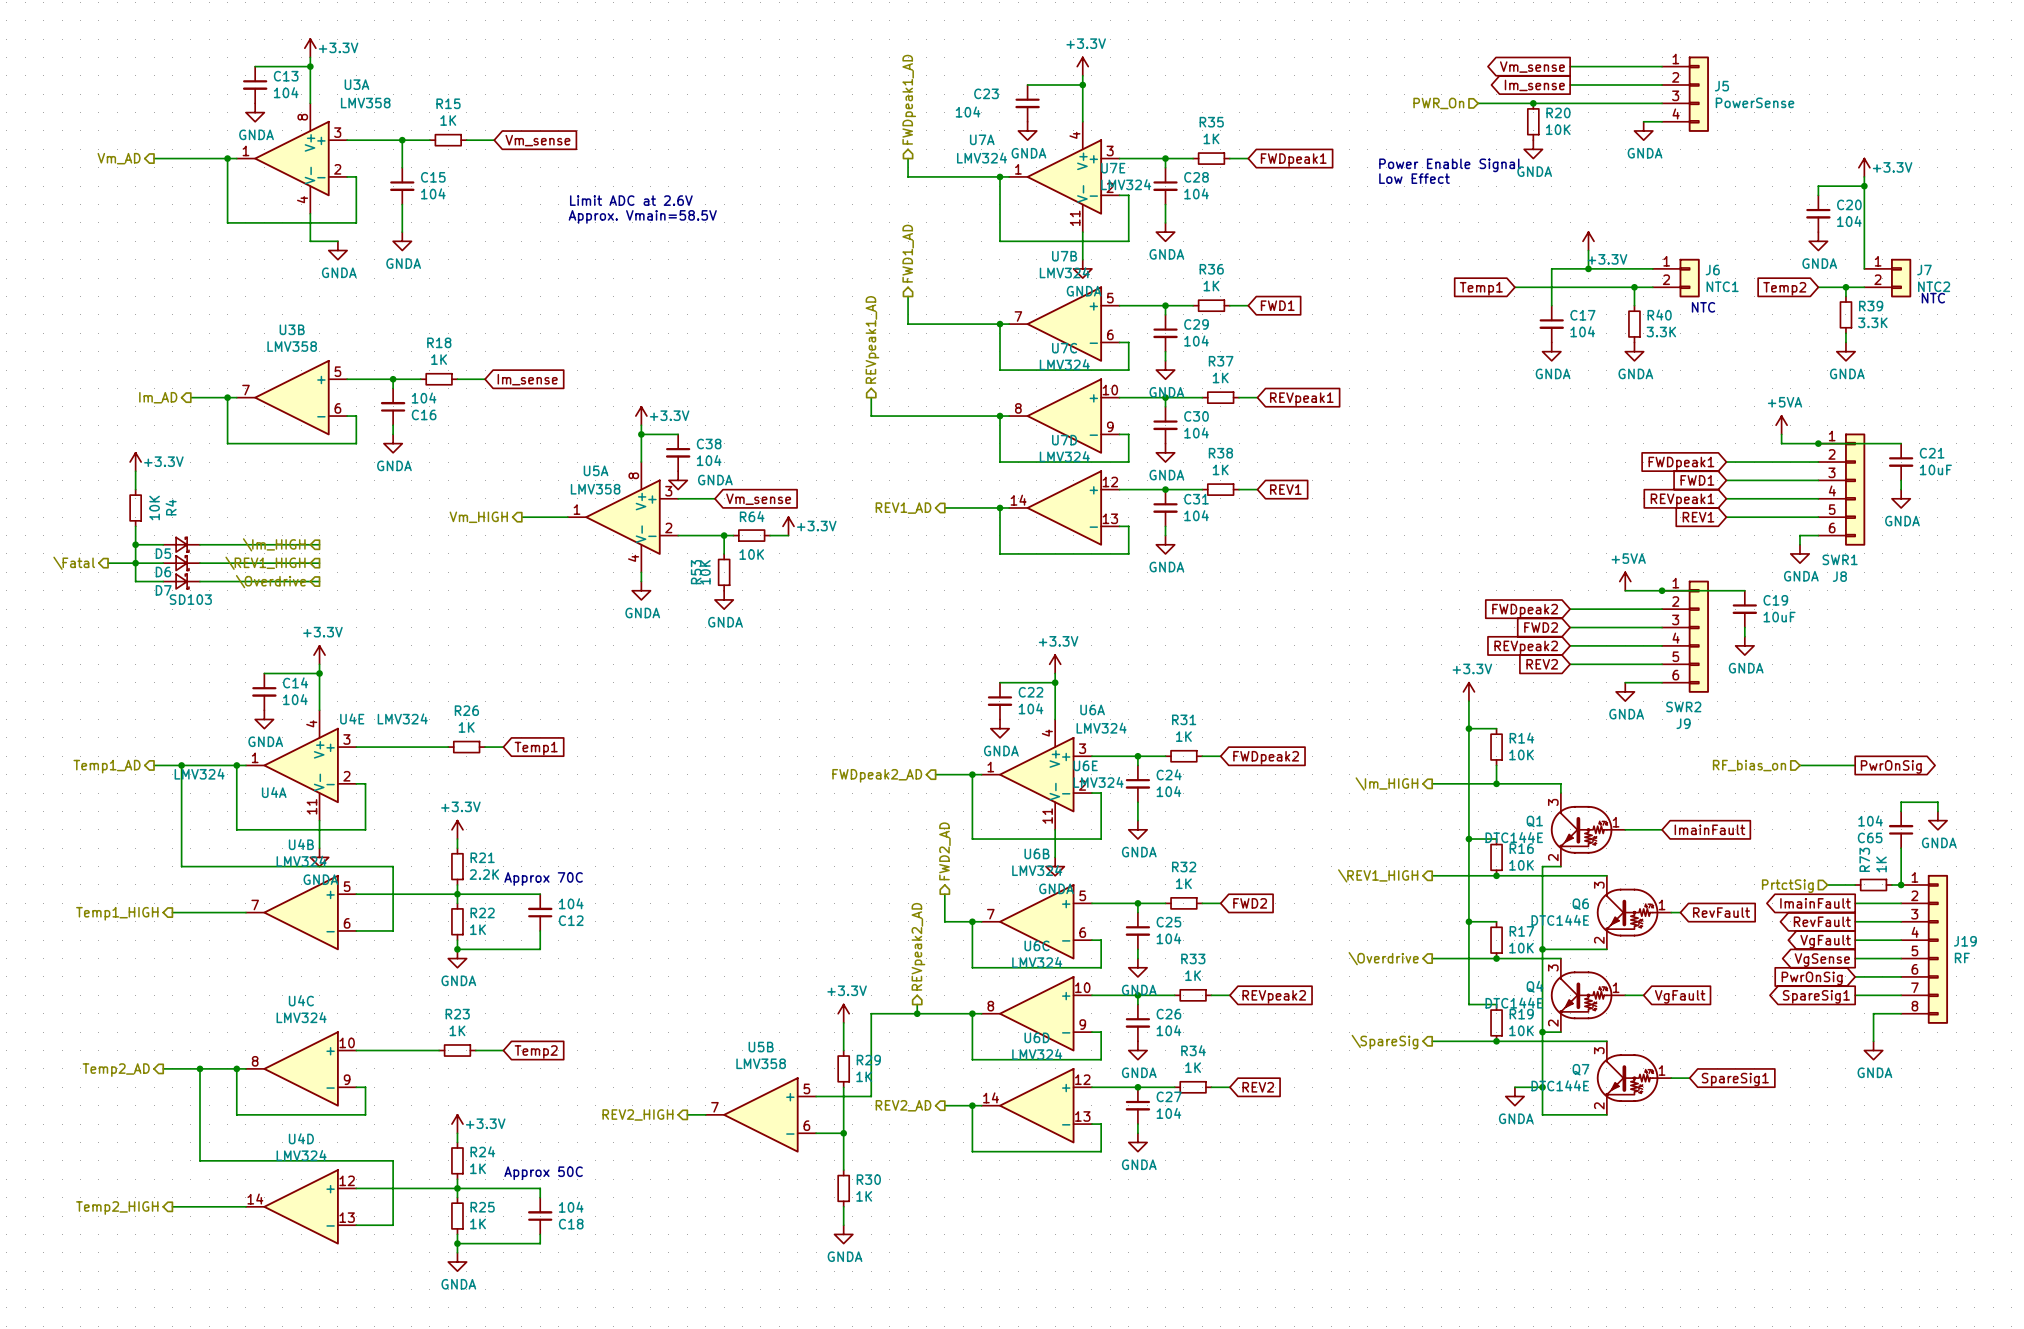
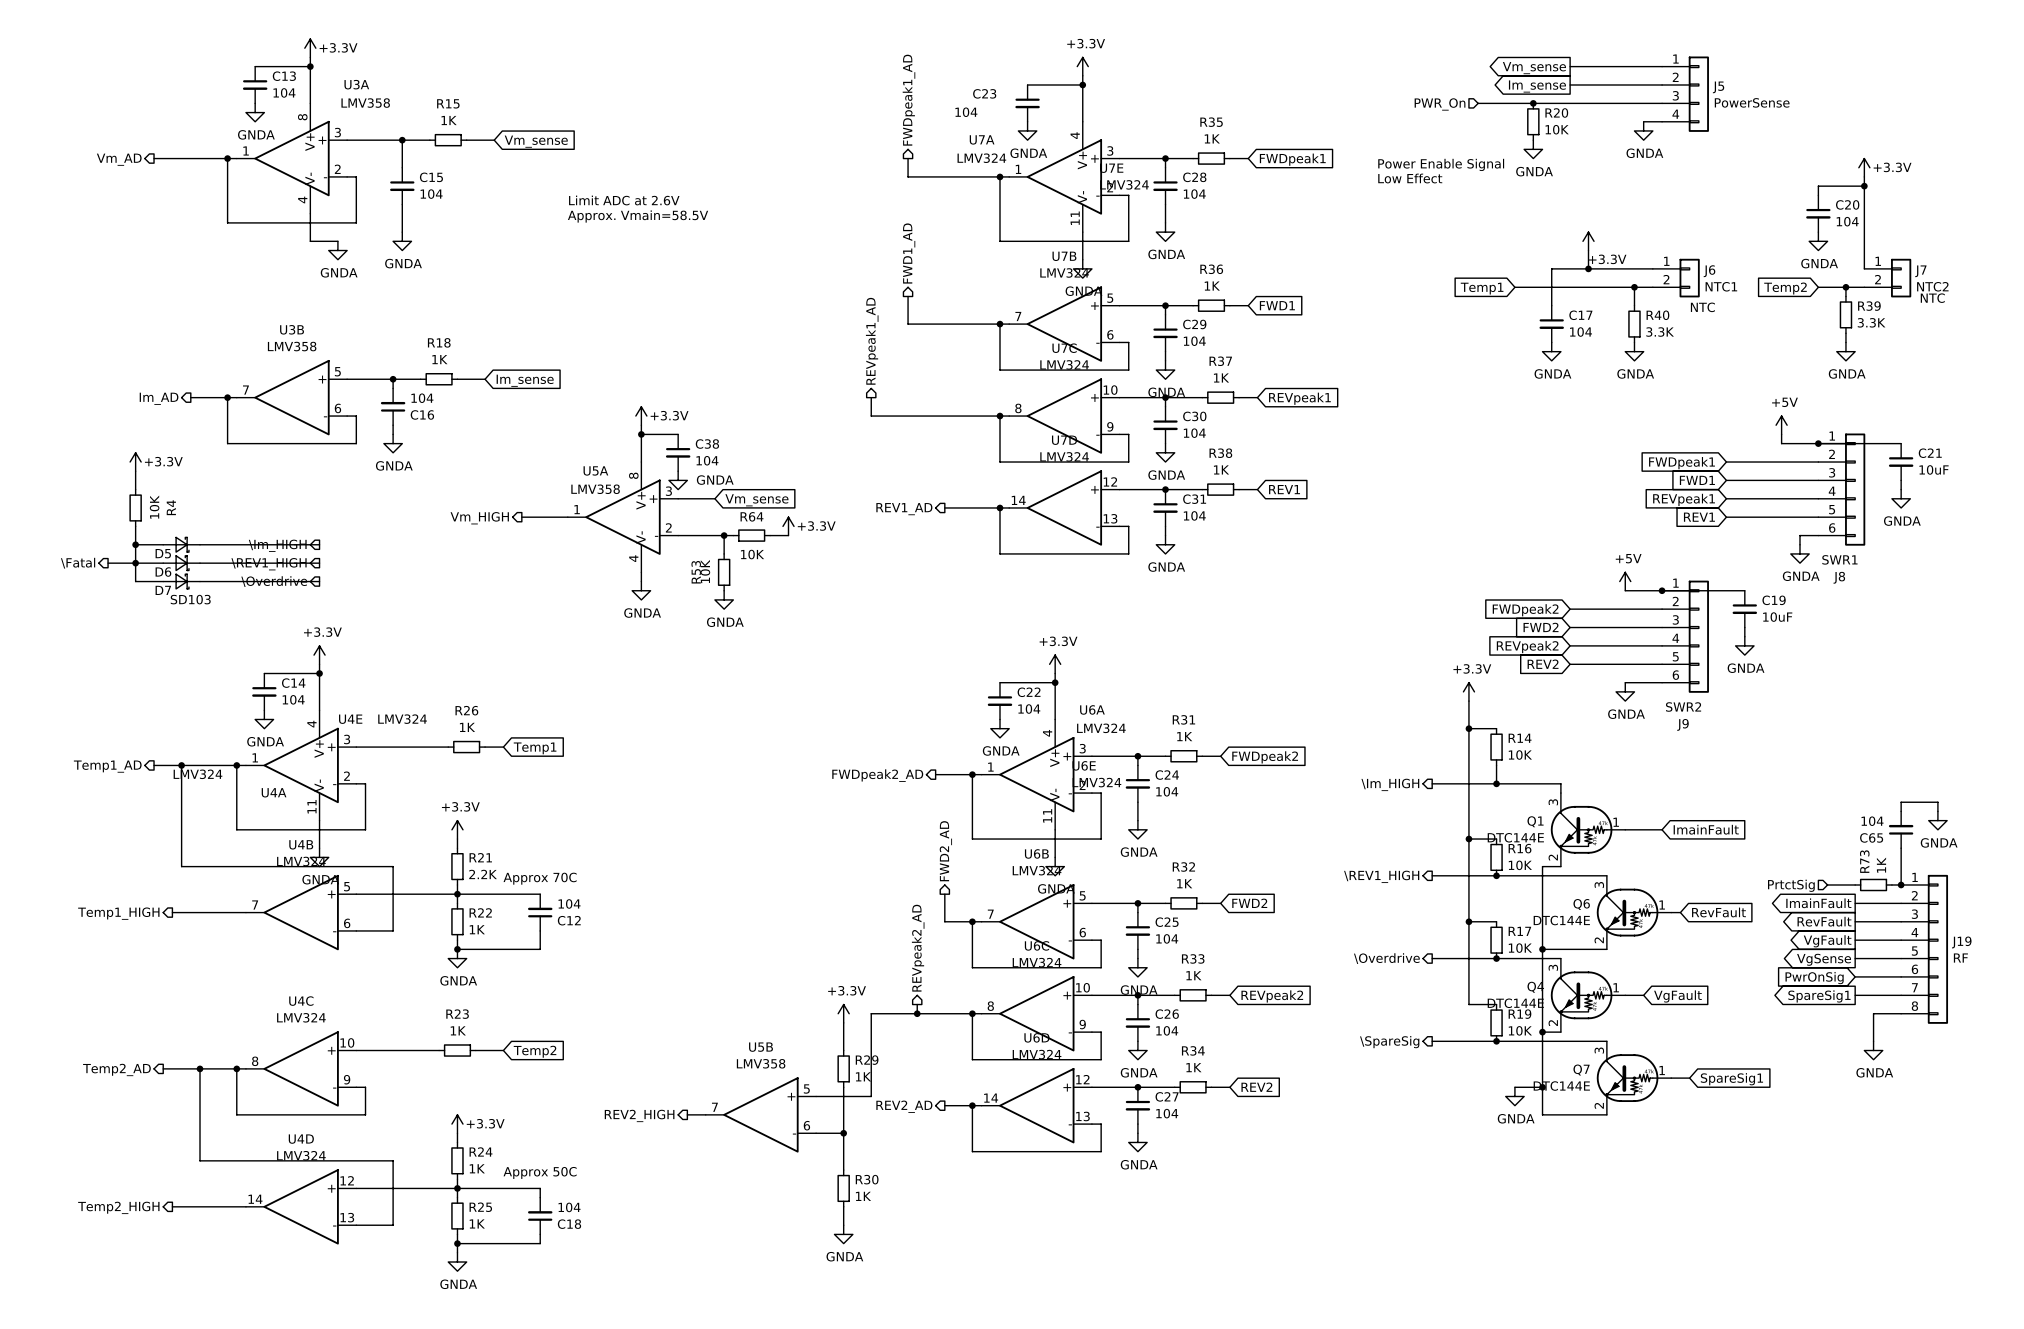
power symbol: +5VA (1781, 425) -> +5V (1781, 425)
power symbol: +5VA (1625, 581) -> +5V (1625, 581)
hierarchical label: RF_bias_on (1749, 765) -> none
wire: (1799, 765) (1855, 765) -> none
global label: PwrOnSig (1891, 766) -> none

